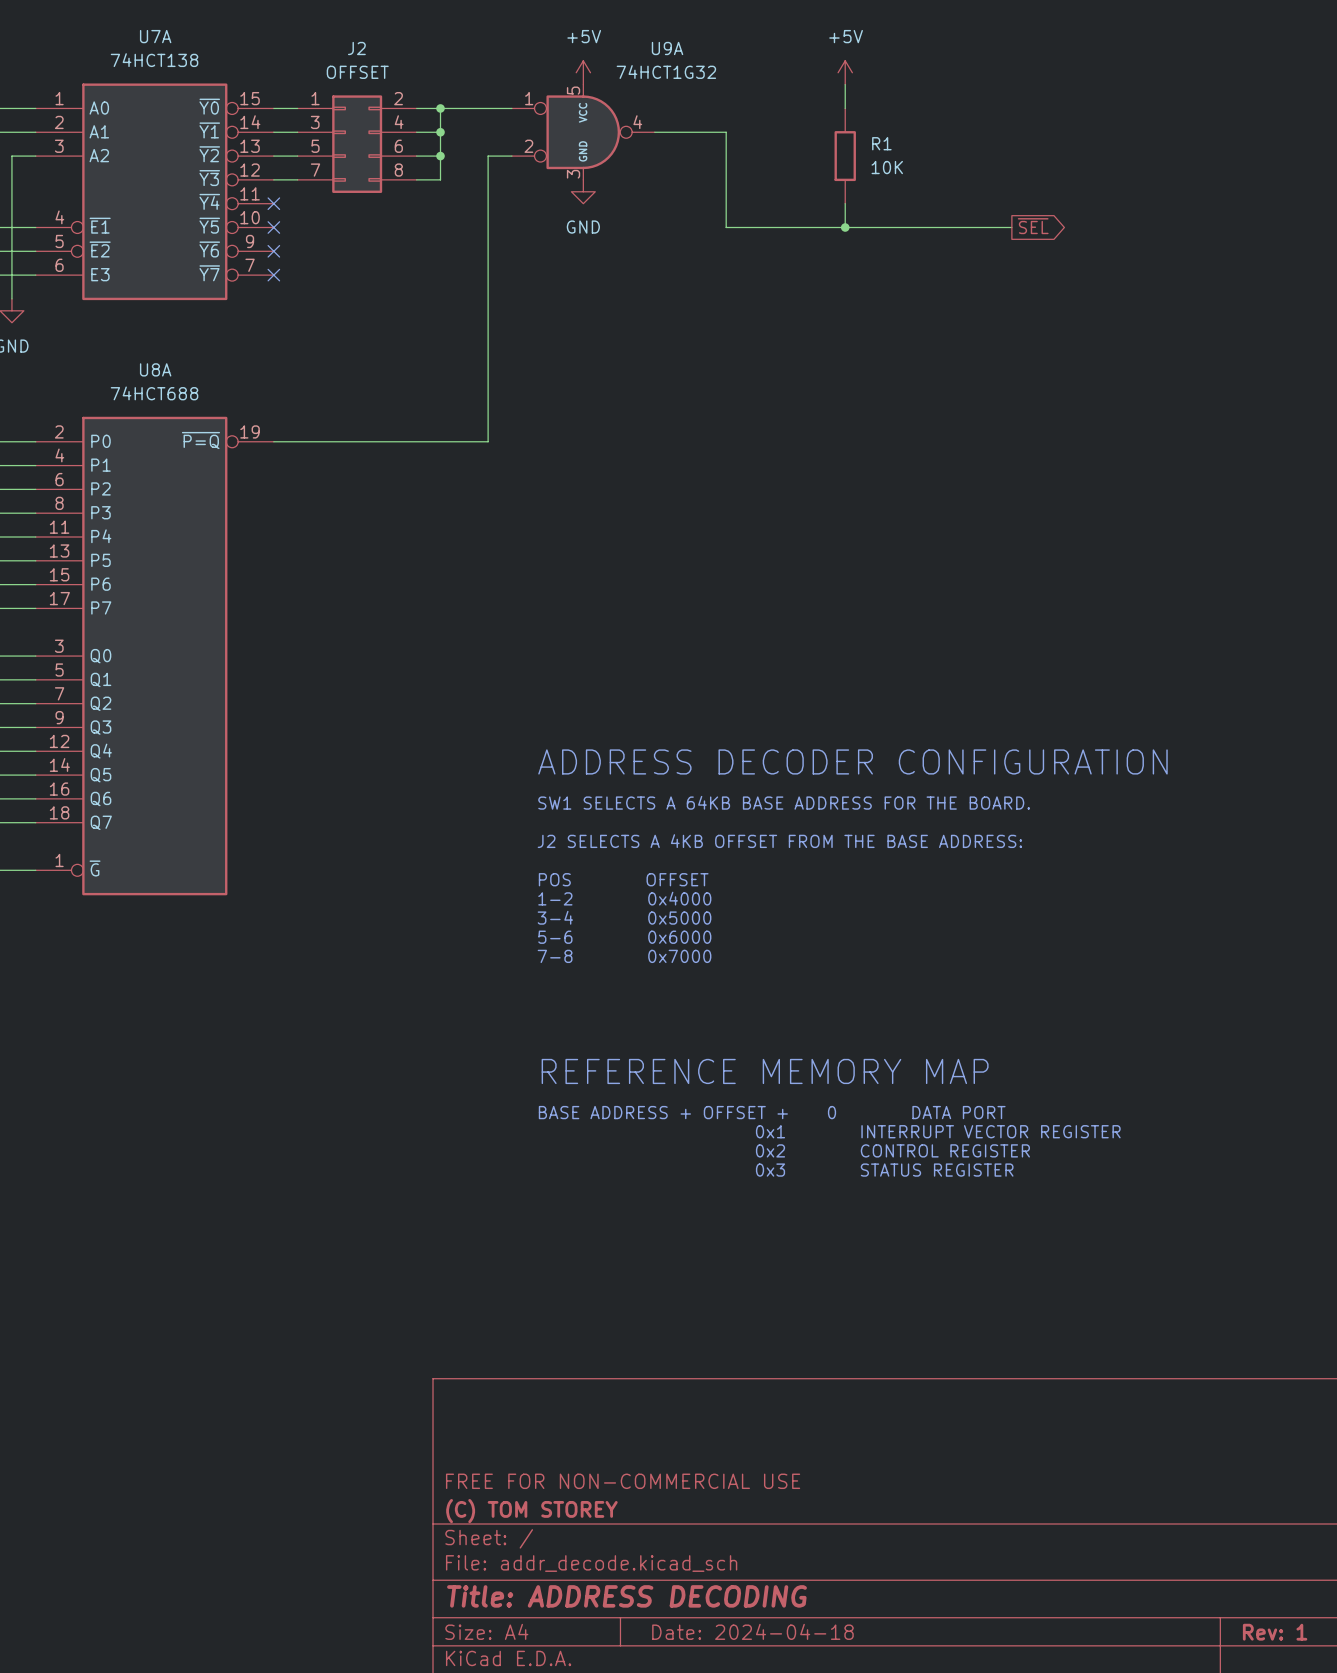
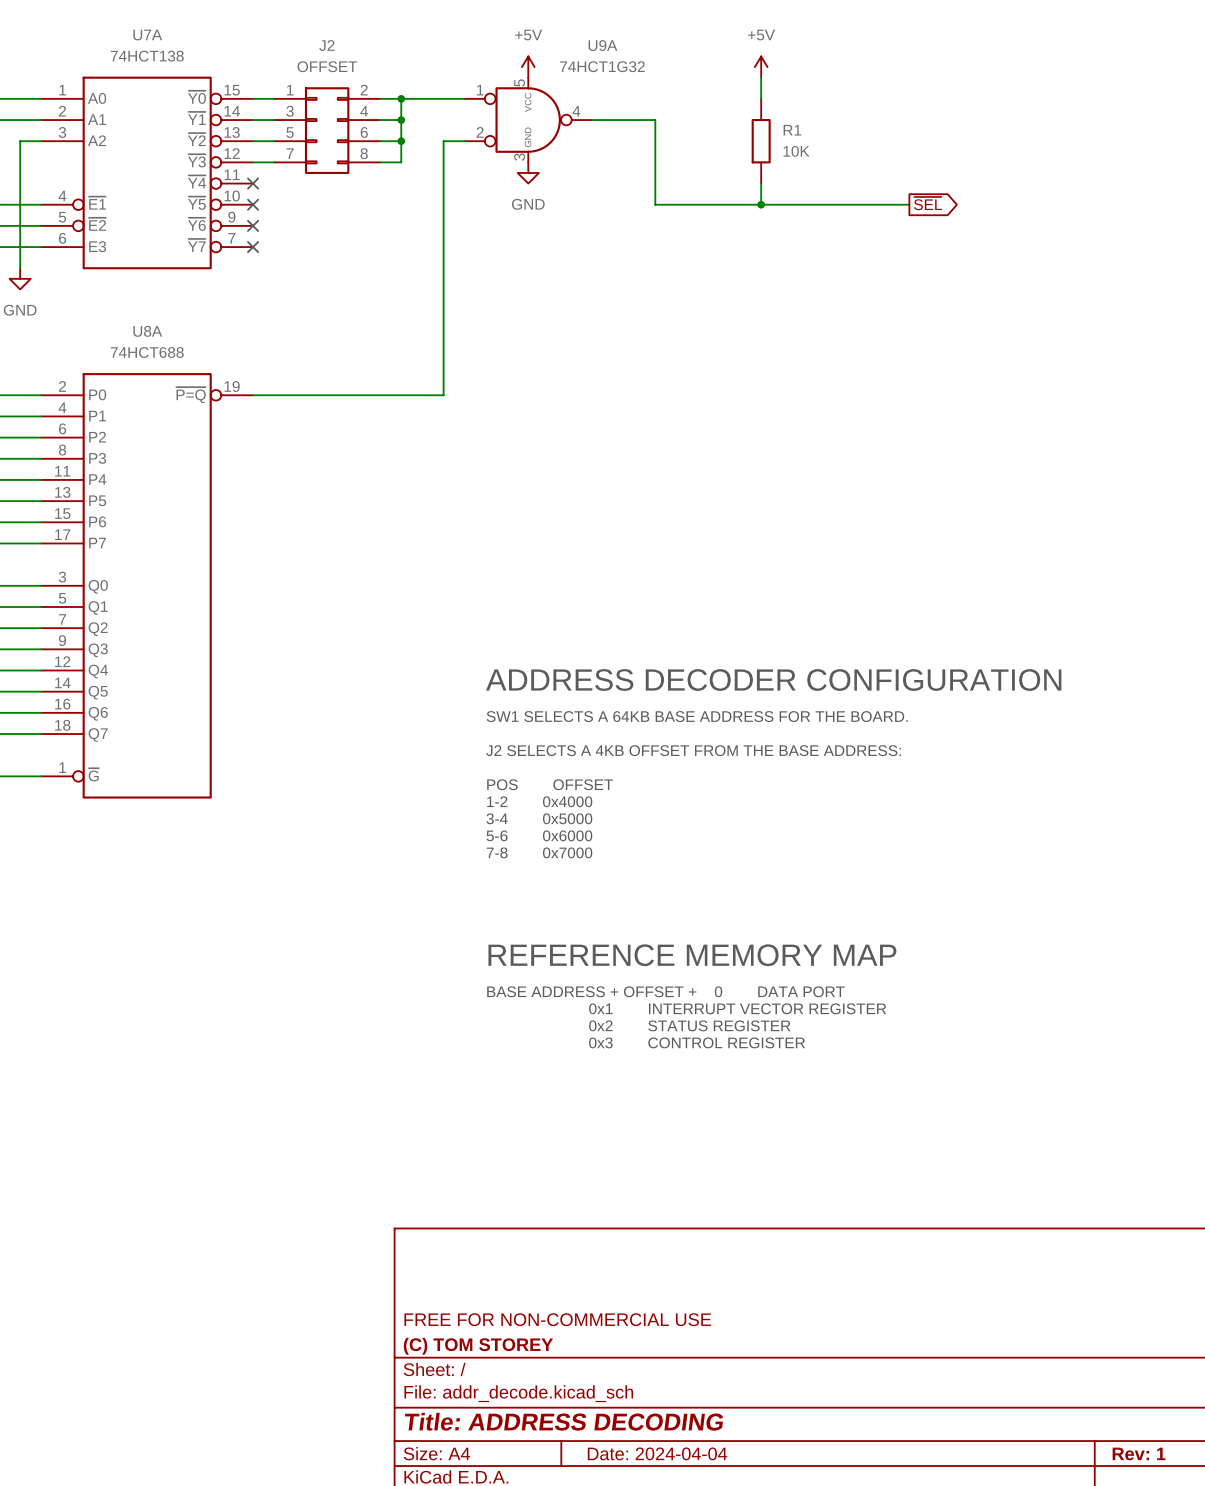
text: 0x2 CONTROL REGISTER (892, 1150) -> 0x2 STATUS REGISTER (689, 1025)
text: 0x3 STATUS REGISTER (884, 1170) -> 0x3 CONTROL REGISTER (697, 1042)
title block: Date: 2024-04-18 (752, 1631) -> Date: 2024-04-04 (657, 1453)

